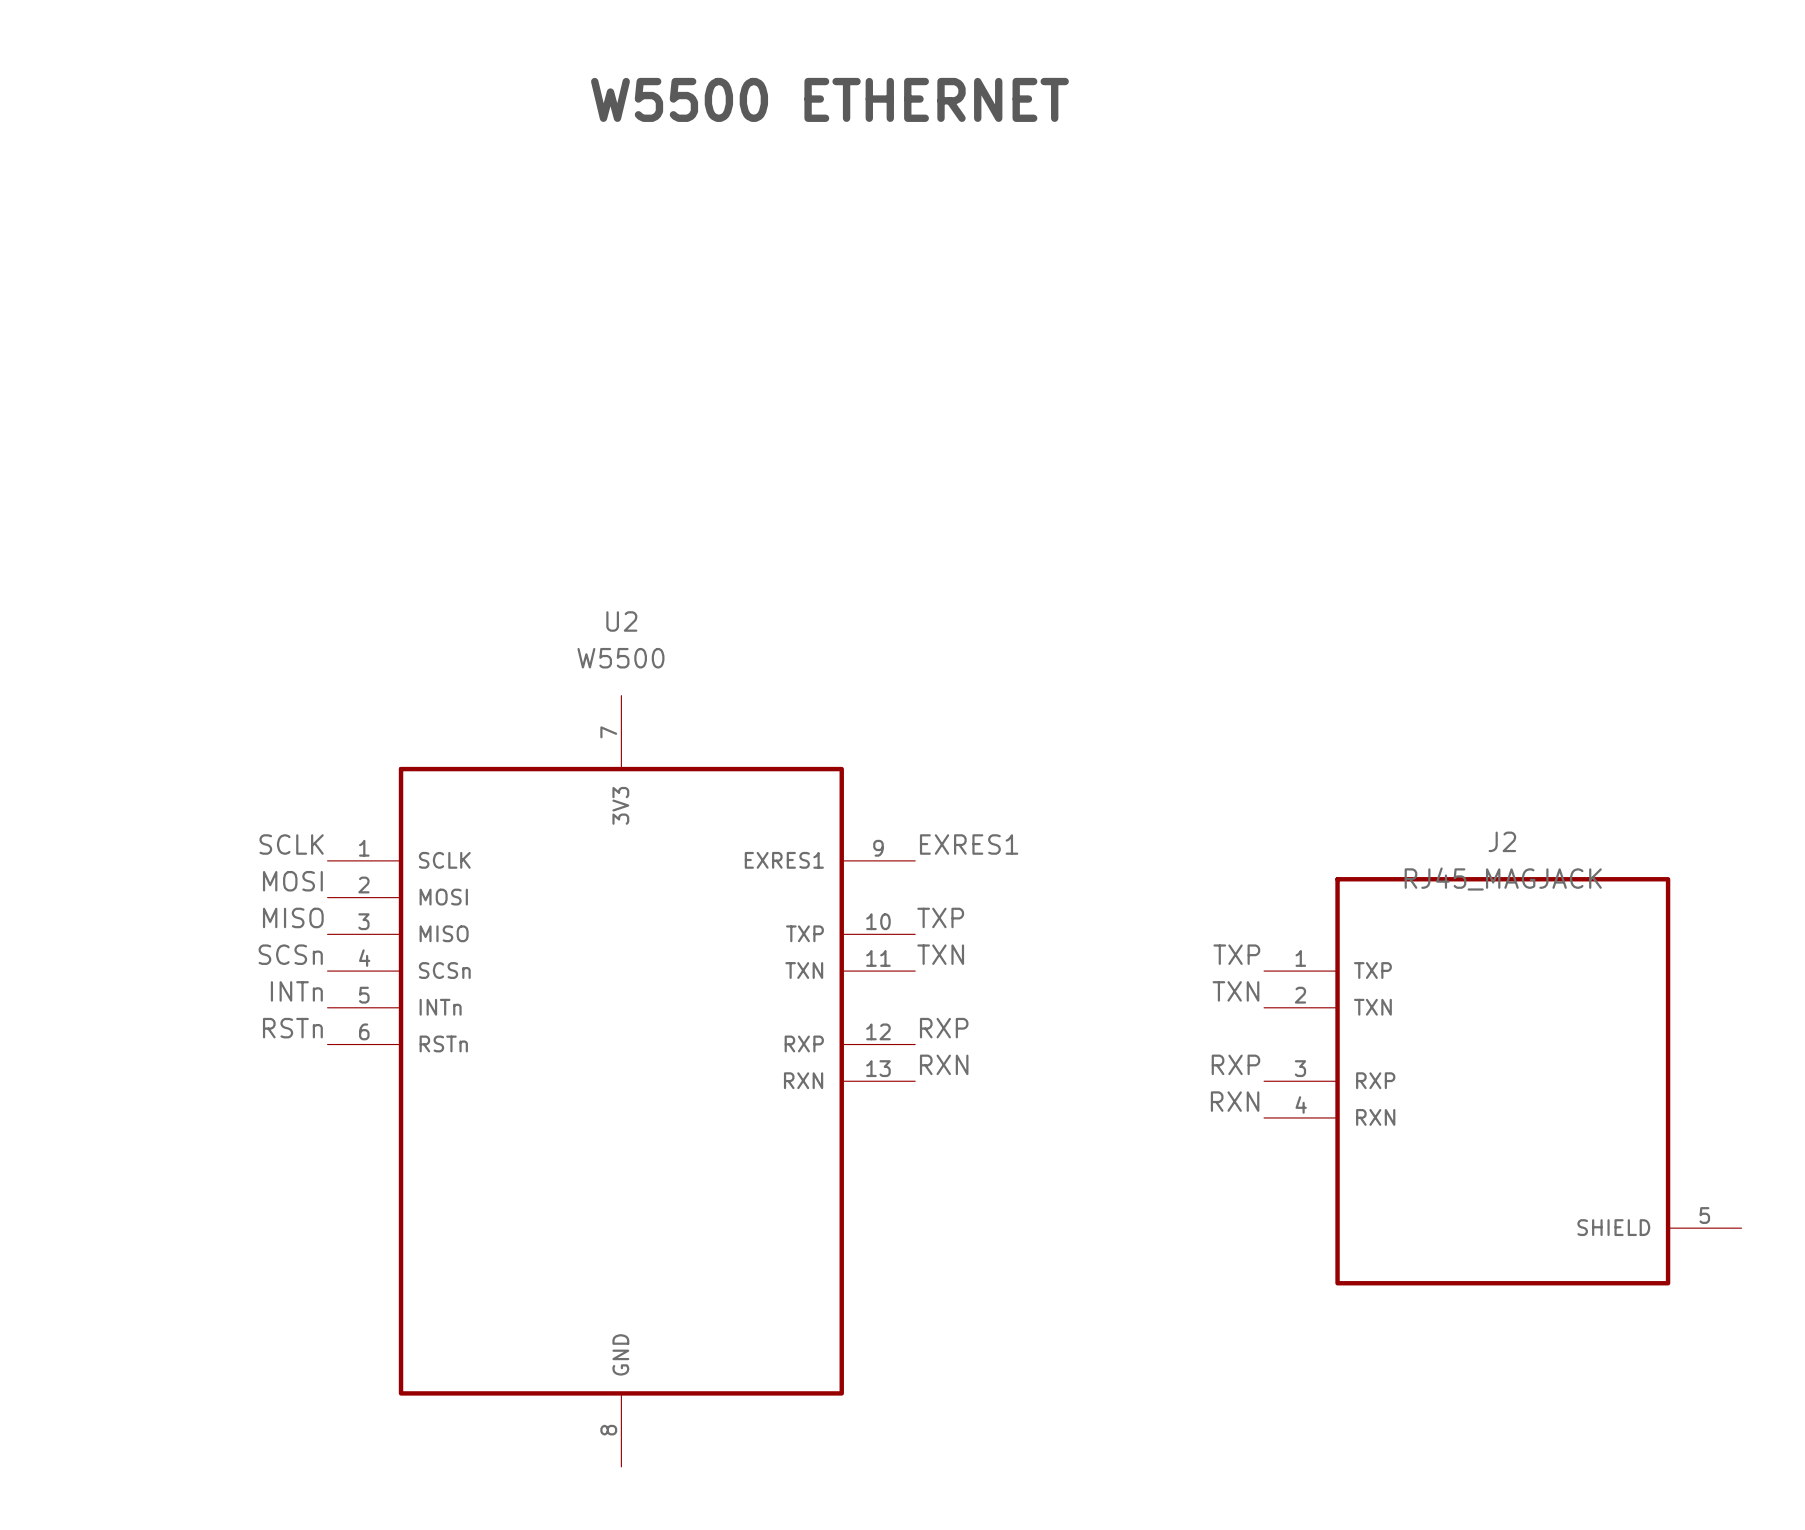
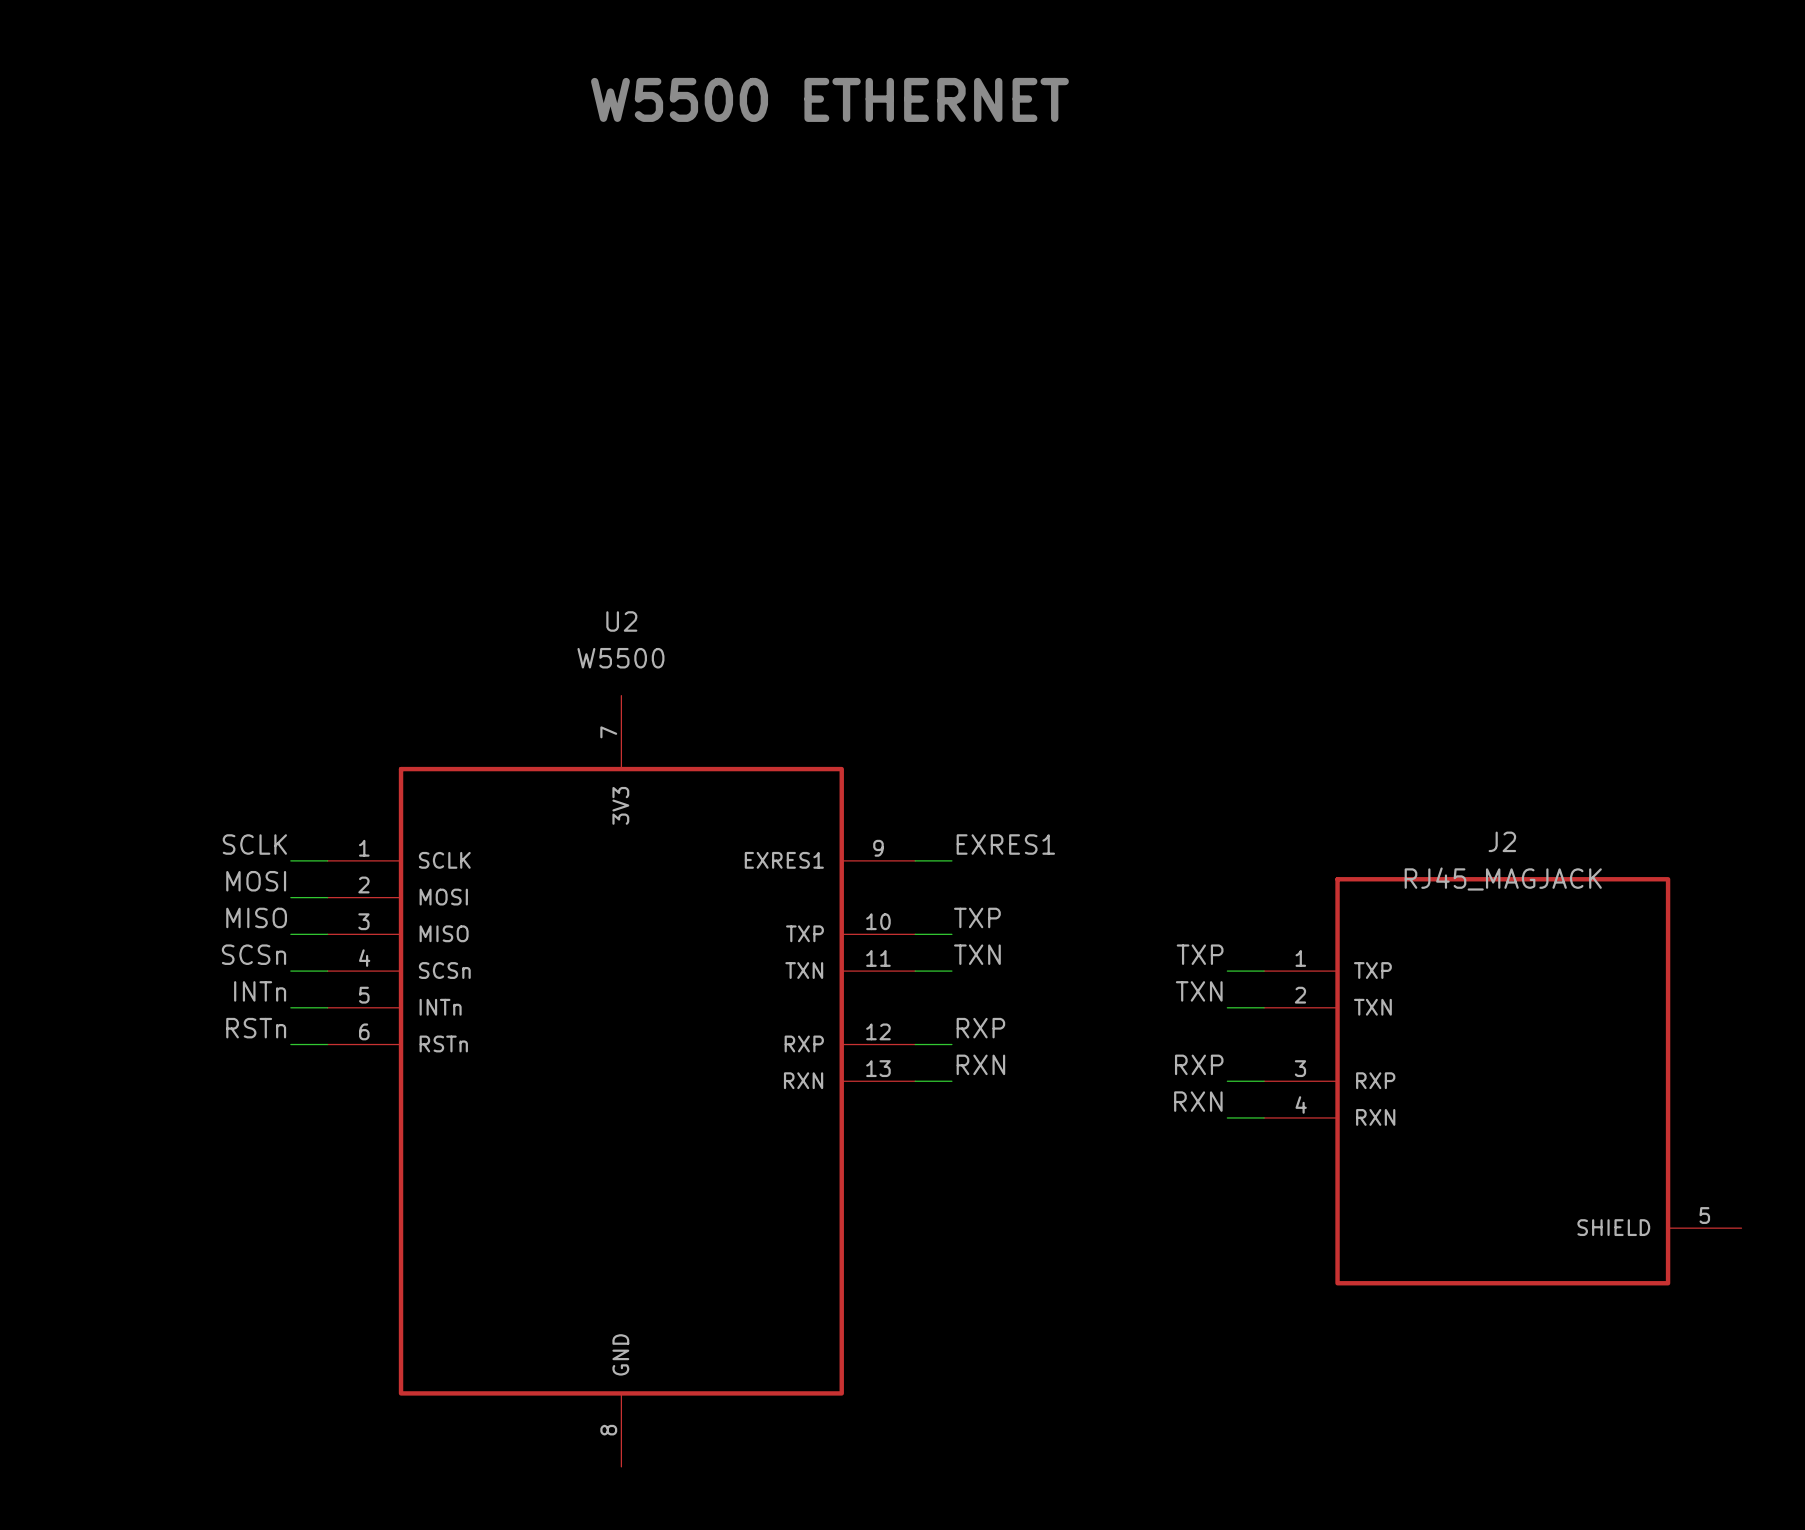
label position: SCLK (291, 844) -> SCLK (254, 844)
label position: EXRES1 (969, 844) -> EXRES1 (1005, 844)
wire: none -> (290, 860) (327, 860)
wire: none -> (915, 860) (951, 860)
label position: MOSI (292, 881) -> MOSI (256, 881)
wire: none -> (290, 897) (327, 897)
label position: MISO (293, 917) -> MISO (256, 917)
label position: TXP (940, 917) -> TXP (977, 917)
wire: none -> (290, 934) (327, 934)
wire: none -> (915, 934) (951, 934)
label position: SCSn (290, 954) -> SCSn (253, 954)
label position: TXN (940, 954) -> TXN (977, 954)
label position: TXP (1236, 954) -> TXP (1200, 954)
wire: none -> (290, 971) (327, 971)
wire: none -> (915, 971) (951, 971)
wire: none -> (1227, 971) (1264, 971)
label position: INTn (296, 991) -> INTn (260, 991)
label position: TXN (1235, 991) -> TXN (1199, 991)
wire: none -> (290, 1007) (327, 1007)
wire: none -> (1227, 1007) (1264, 1007)
label position: RSTn (292, 1028) -> RSTn (256, 1028)
label position: RXP (944, 1028) -> RXP (980, 1028)
wire: none -> (290, 1044) (327, 1044)
wire: none -> (915, 1044) (951, 1044)
label position: RXN (944, 1064) -> RXN (980, 1064)
label position: RXP (1235, 1064) -> RXP (1199, 1064)
wire: none -> (915, 1081) (951, 1081)
wire: none -> (1227, 1081) (1264, 1081)
label position: RXN (1235, 1101) -> RXN (1198, 1101)
wire: none -> (1227, 1117) (1264, 1117)

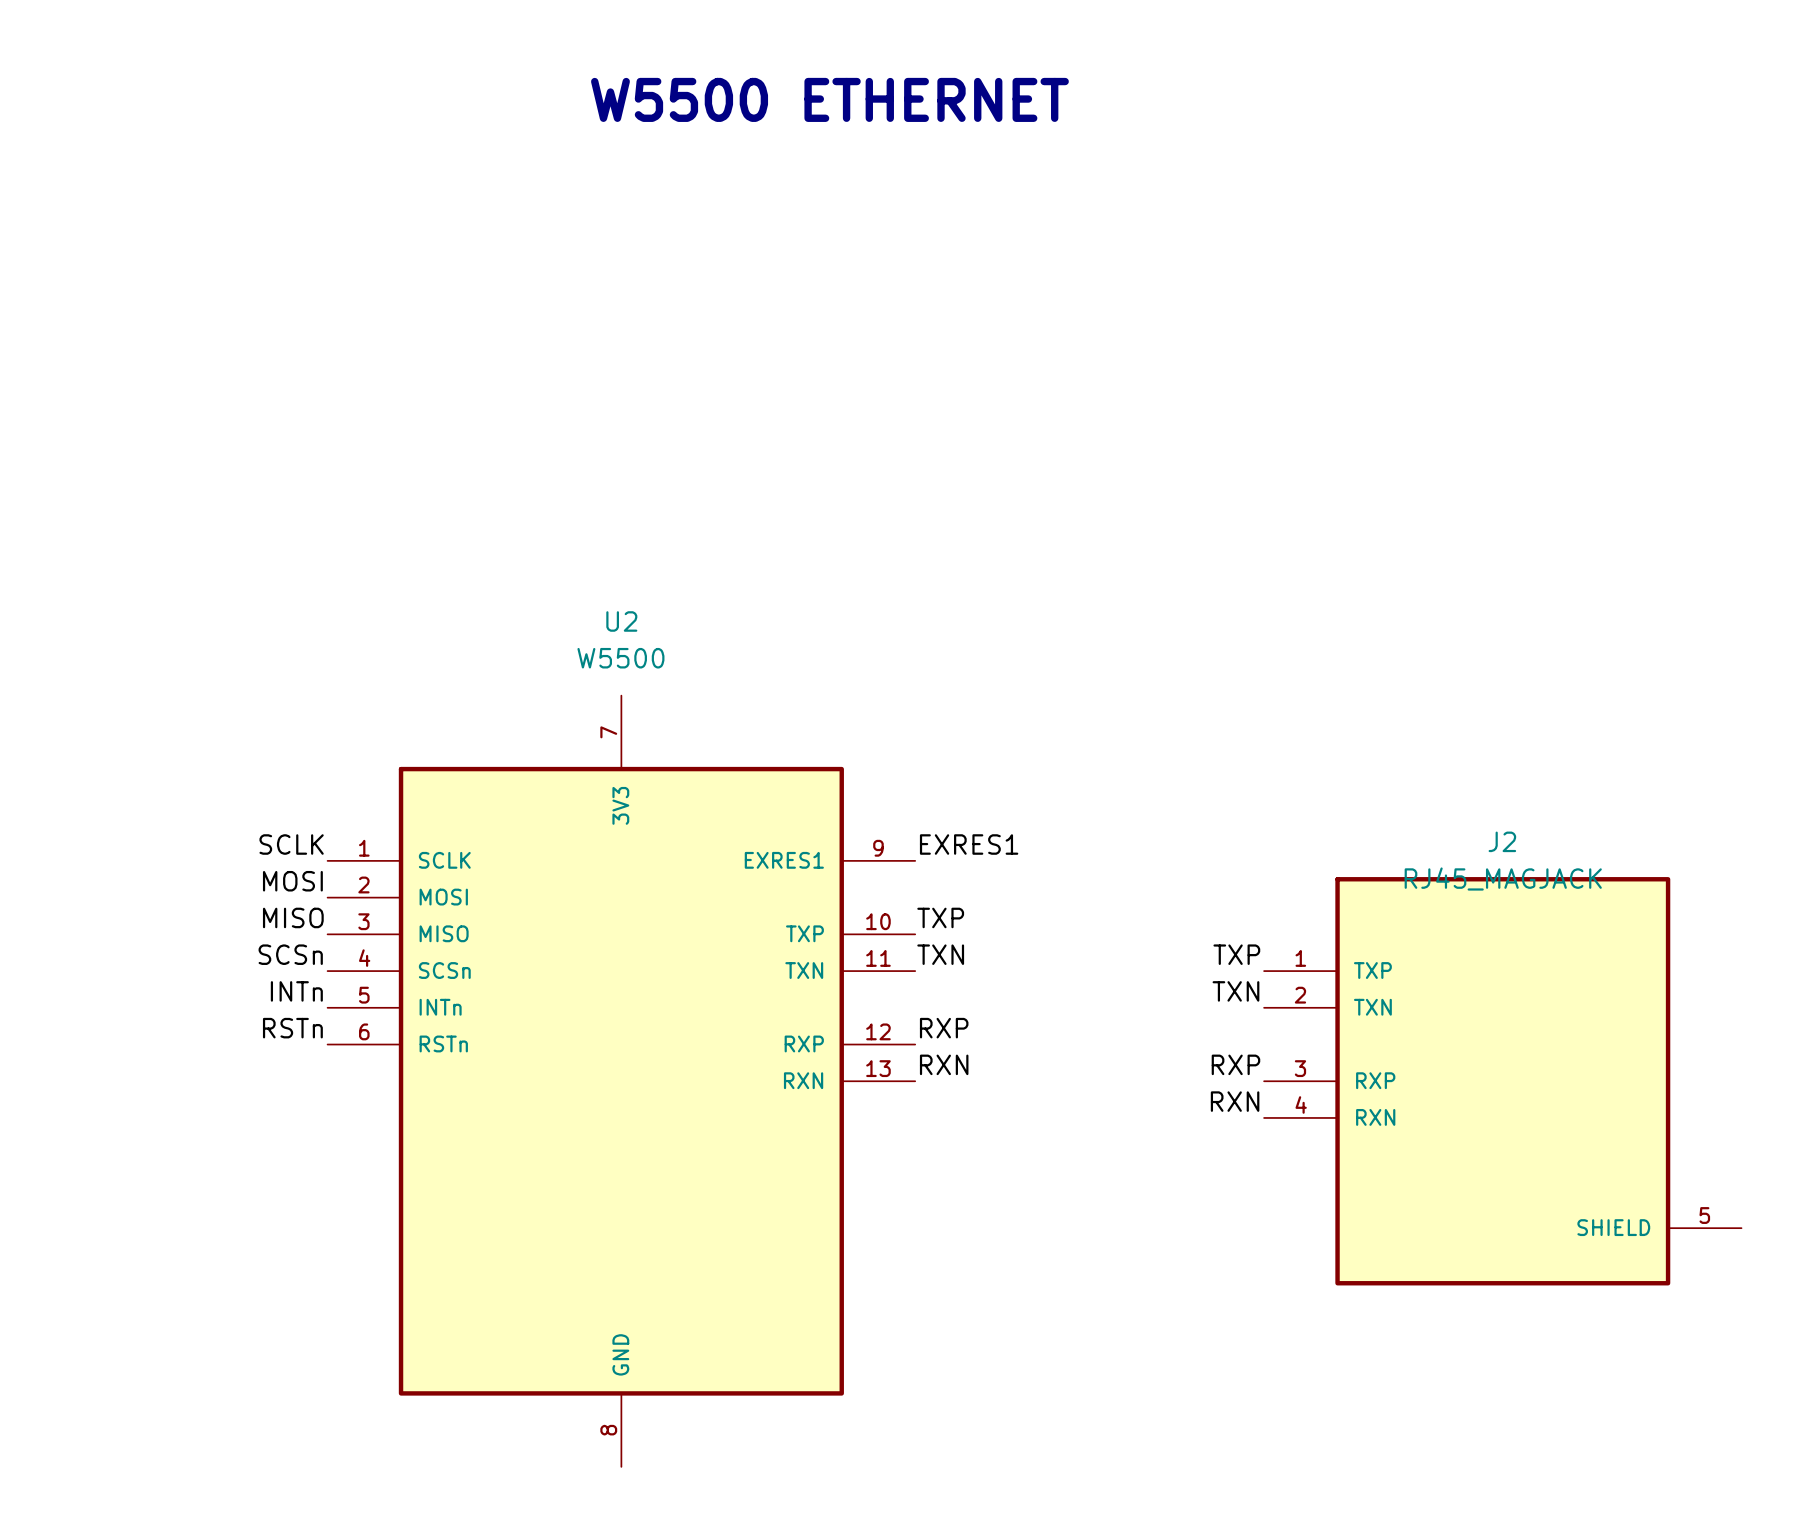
label position: SCLK (254, 844) -> SCLK (291, 844)
label position: EXRES1 (1005, 844) -> EXRES1 (969, 844)
wire: (290, 860) (327, 860) -> none
wire: (915, 860) (951, 860) -> none
label position: MOSI (256, 881) -> MOSI (292, 881)
wire: (290, 897) (327, 897) -> none
label position: MISO (256, 917) -> MISO (293, 917)
label position: TXP (977, 917) -> TXP (940, 917)
wire: (290, 934) (327, 934) -> none
wire: (915, 934) (951, 934) -> none
label position: SCSn (253, 954) -> SCSn (290, 954)
label position: TXN (977, 954) -> TXN (940, 954)
label position: TXP (1200, 954) -> TXP (1236, 954)
wire: (290, 971) (327, 971) -> none
wire: (915, 971) (951, 971) -> none
wire: (1227, 971) (1264, 971) -> none
label position: INTn (260, 991) -> INTn (296, 991)
label position: TXN (1199, 991) -> TXN (1235, 991)
wire: (290, 1007) (327, 1007) -> none
wire: (1227, 1007) (1264, 1007) -> none
label position: RSTn (256, 1028) -> RSTn (292, 1028)
label position: RXP (980, 1028) -> RXP (944, 1028)
wire: (290, 1044) (327, 1044) -> none
wire: (915, 1044) (951, 1044) -> none
label position: RXN (980, 1064) -> RXN (944, 1064)
label position: RXP (1199, 1064) -> RXP (1235, 1064)
wire: (915, 1081) (951, 1081) -> none
wire: (1227, 1081) (1264, 1081) -> none
label position: RXN (1198, 1101) -> RXN (1235, 1101)
wire: (1227, 1117) (1264, 1117) -> none

